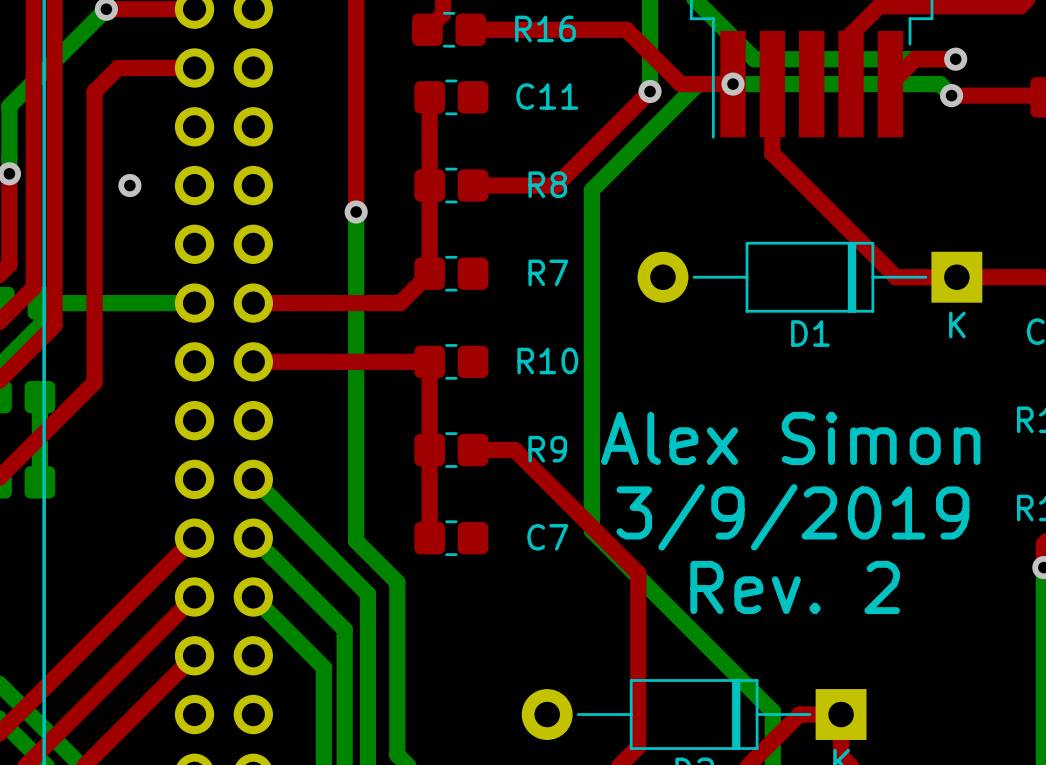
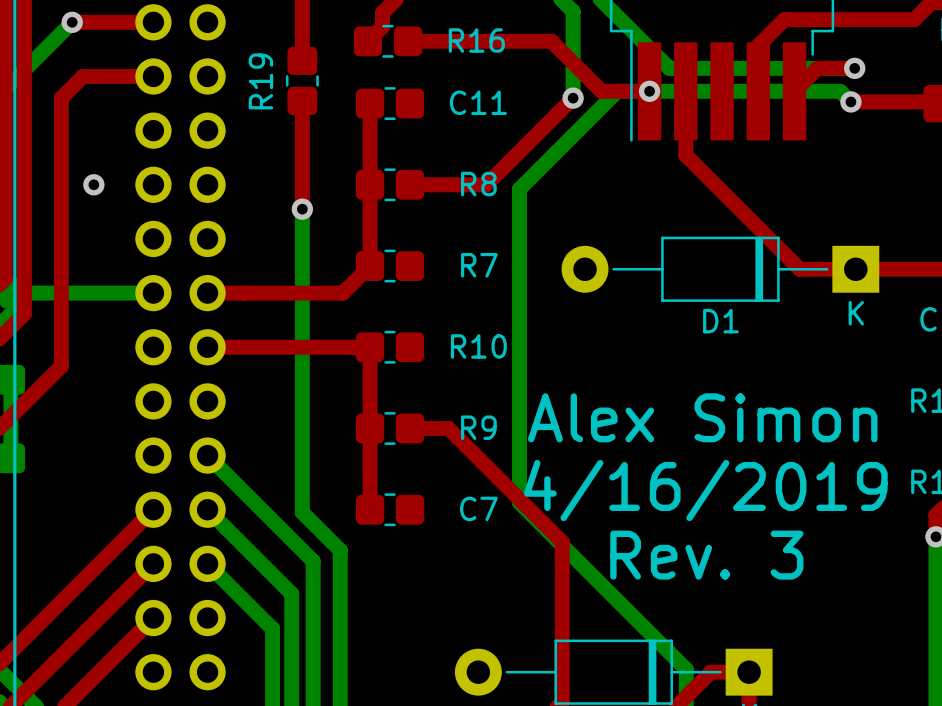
top track: (356, 51) (356, 94) -> none
R19: none -> (302, 80)
text: 3/9/2019 (792, 517) -> 4/16/2019 (705, 490)
text: Rev. 2 (795, 587) -> Rev. 3 (706, 555)

